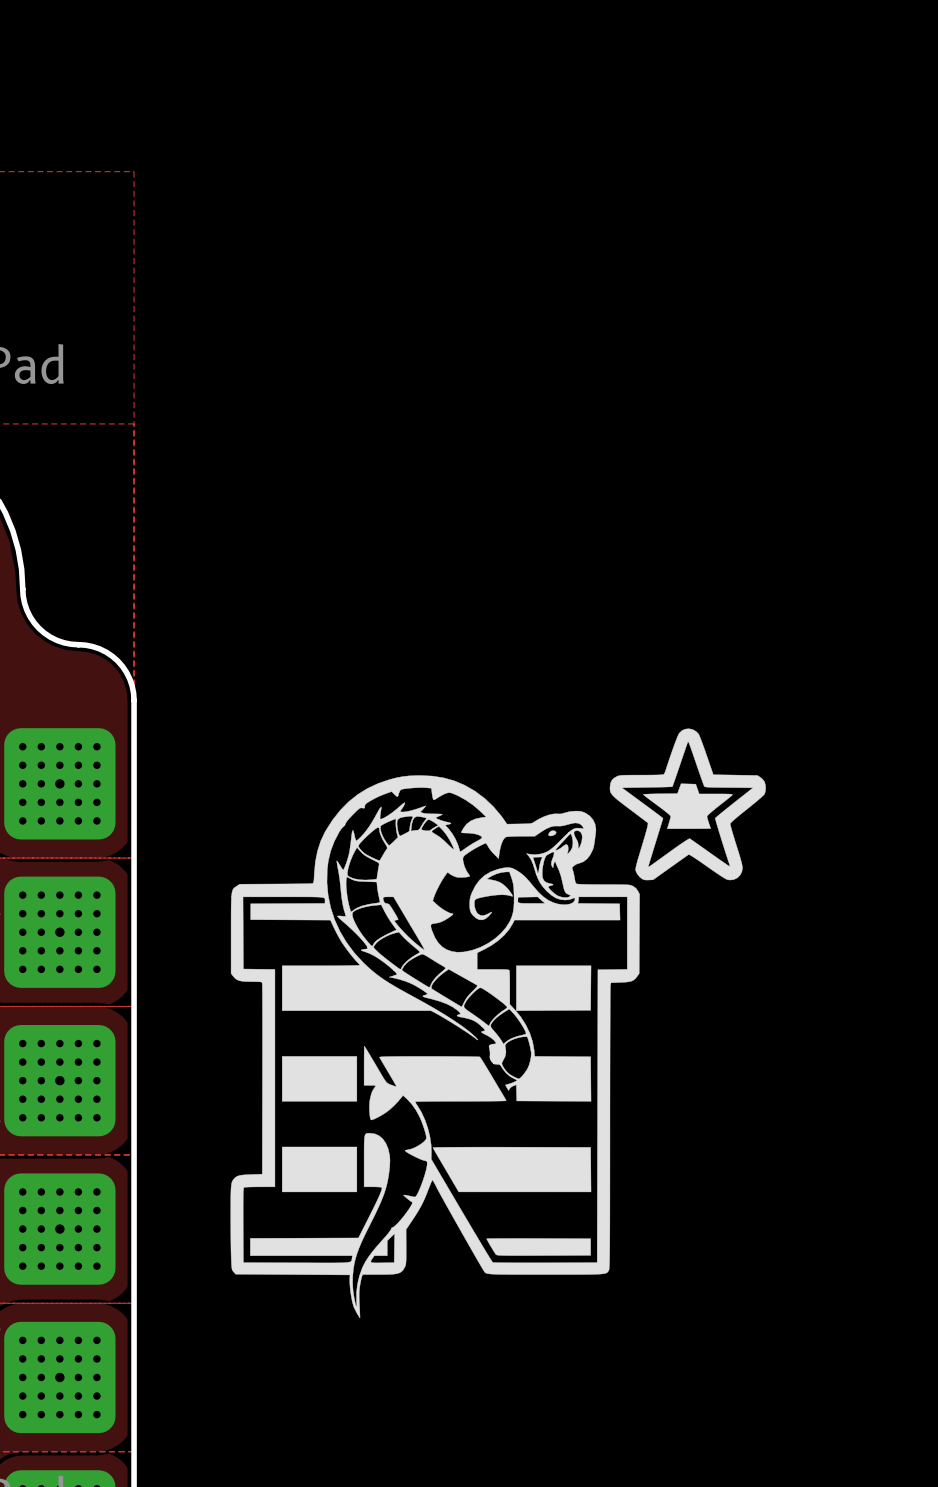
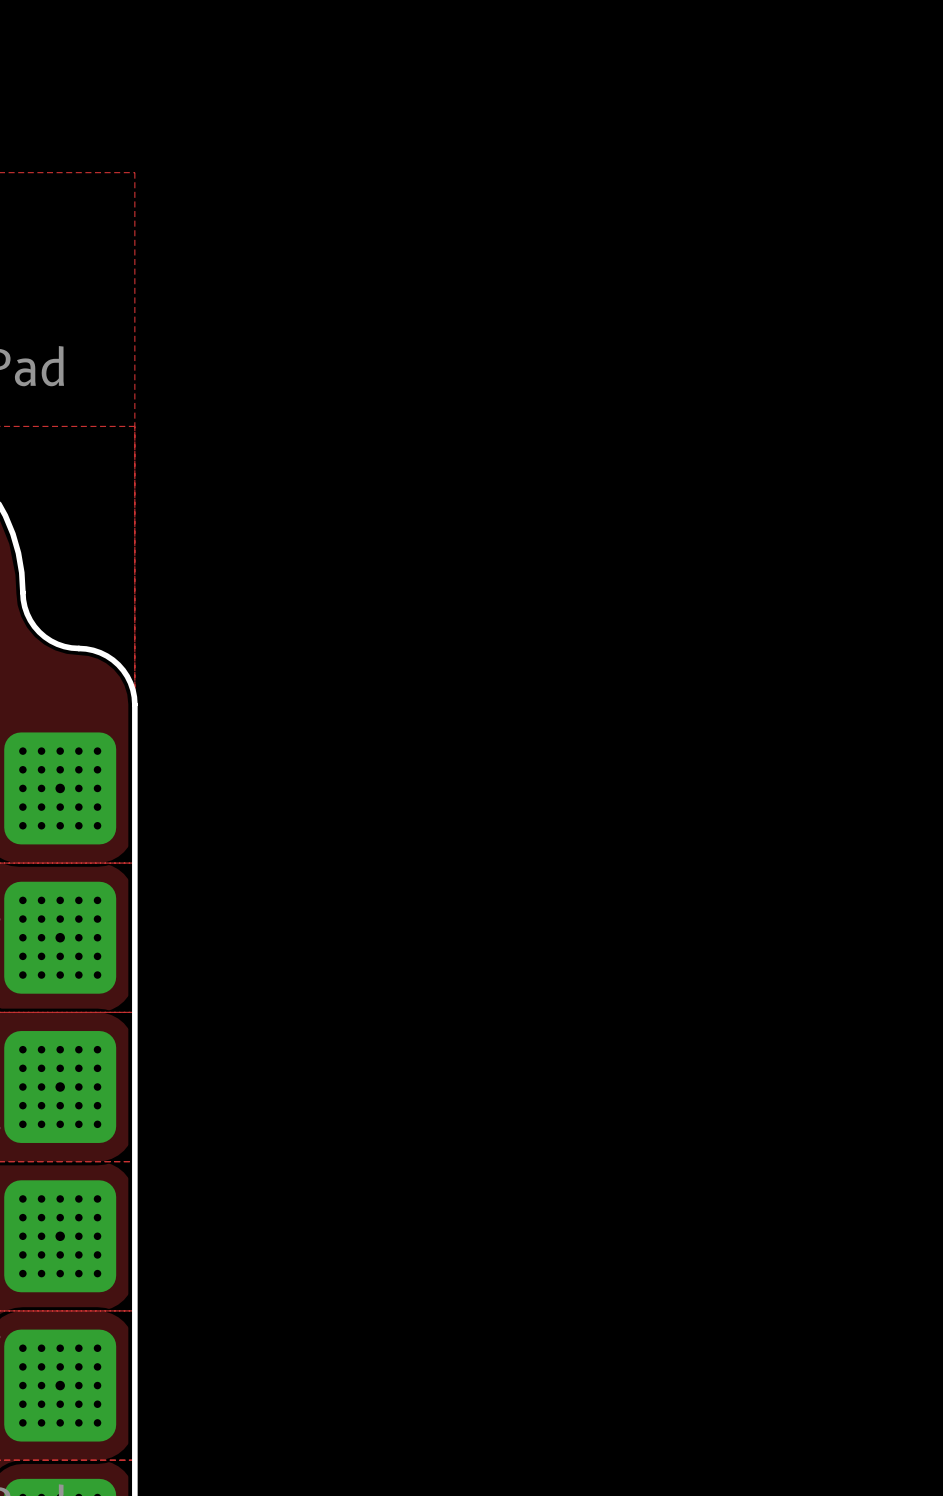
drawing: [230, 728, 766, 1319] -> none

